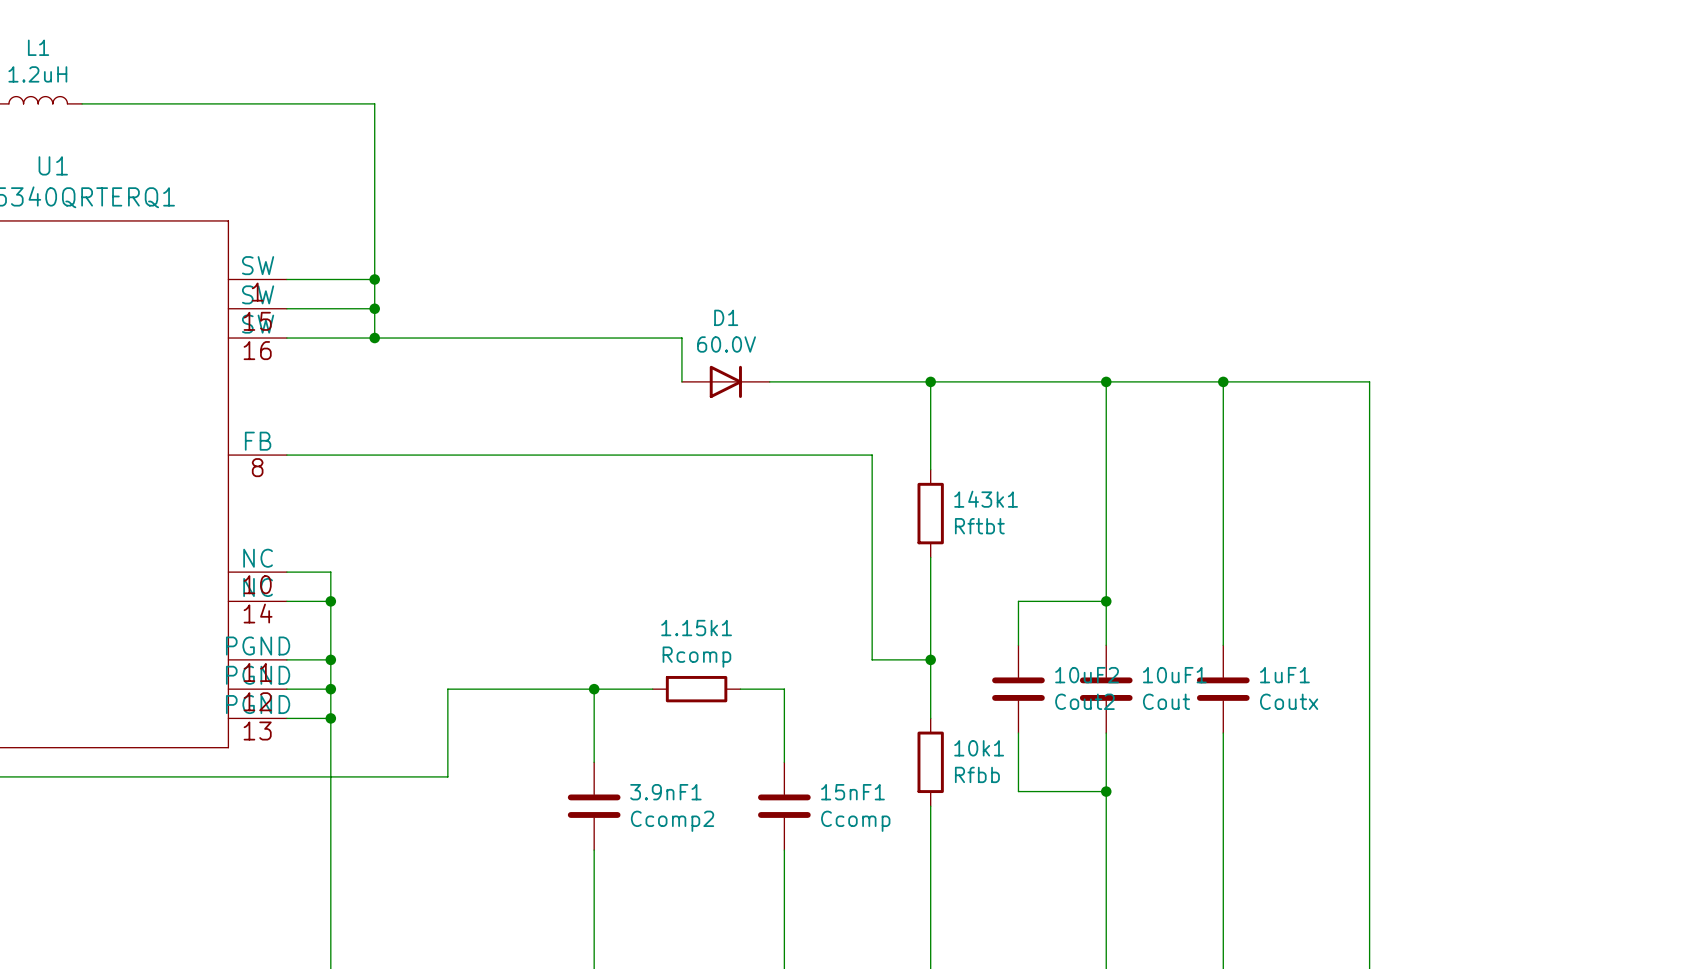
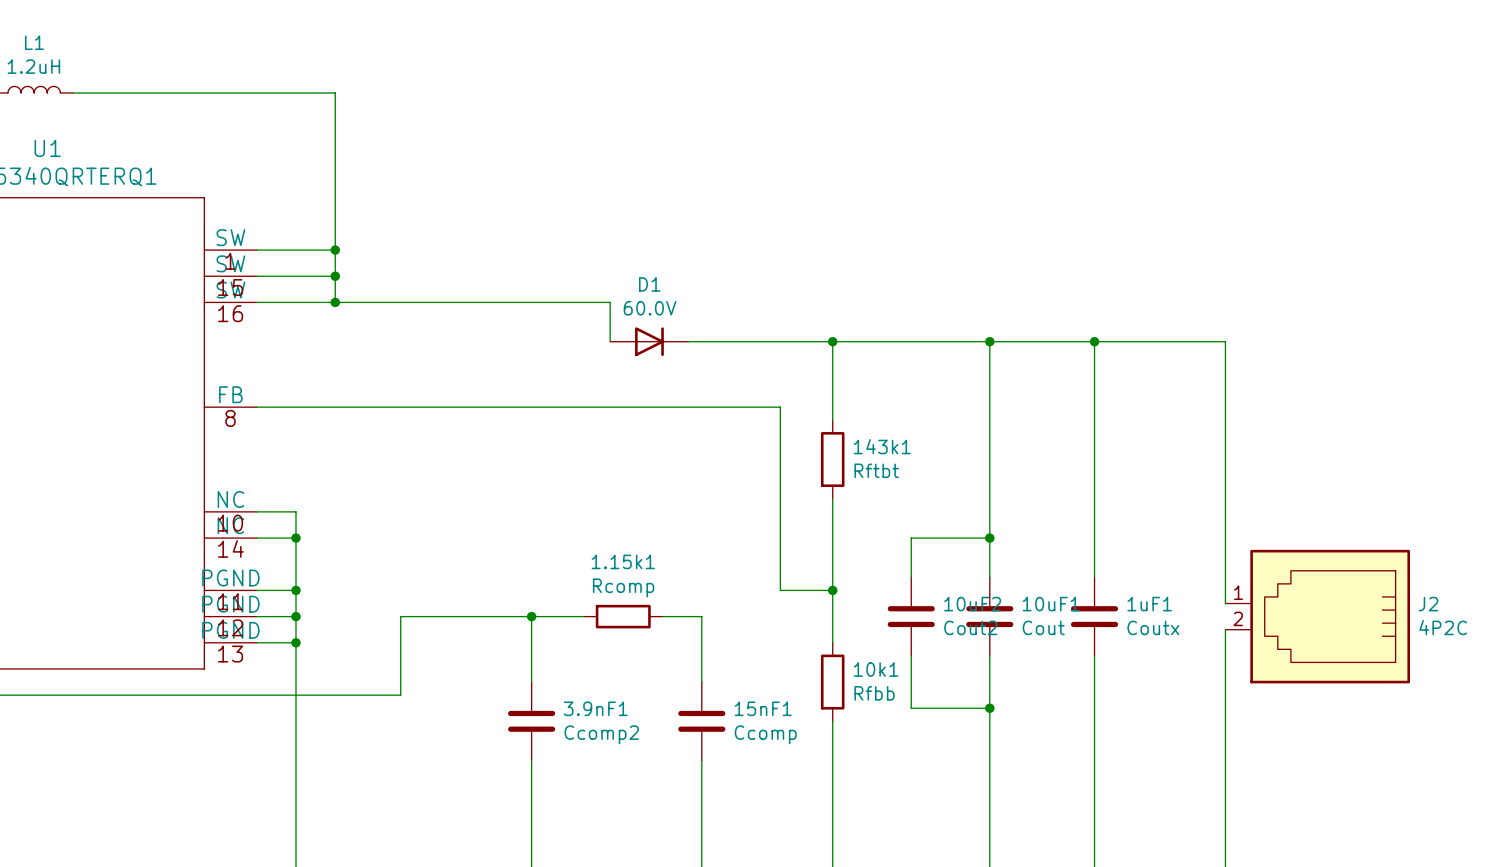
wire: (1369, 674) (1369, 703) -> none
J2: none -> 4P2C (1317, 616)

